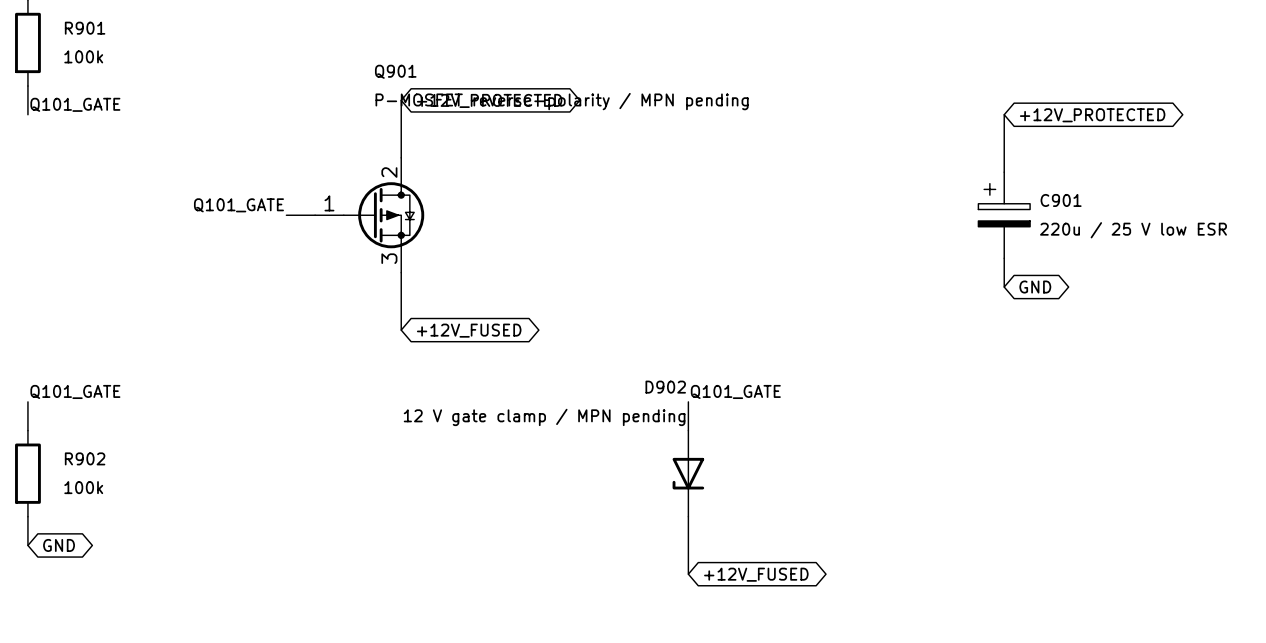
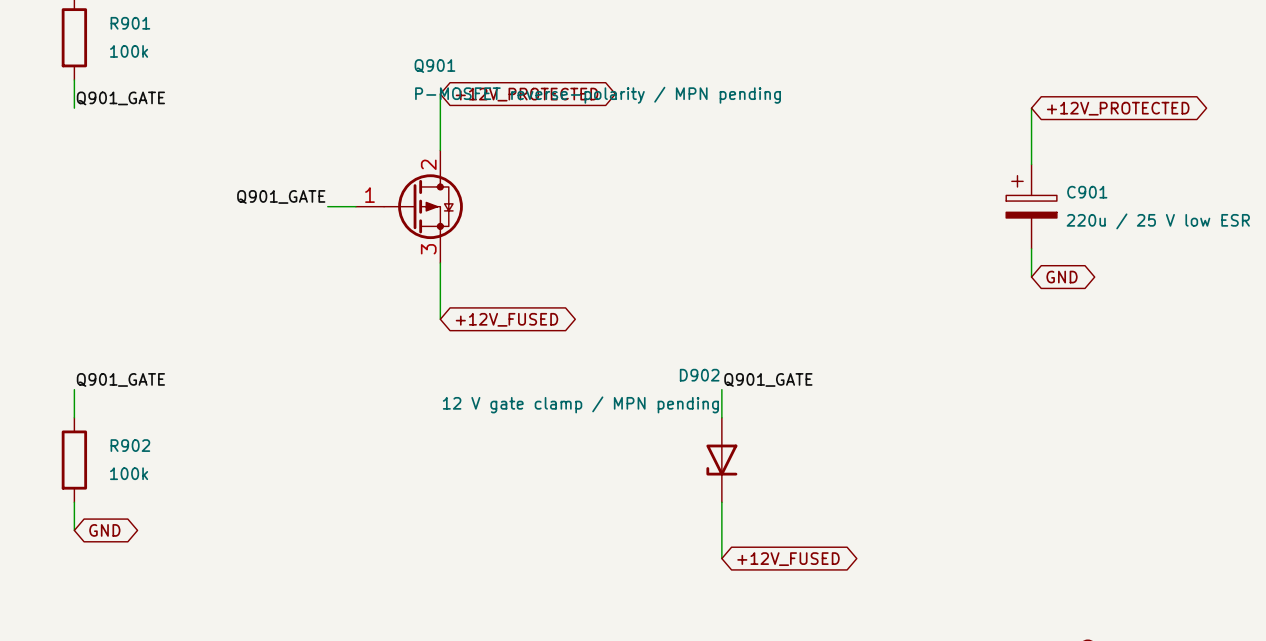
label: Q101_GATE (75, 104) -> Q901_GATE (120, 98)
label: Q101_GATE (238, 205) -> Q901_GATE (281, 196)
label: Q101_GATE (75, 391) -> Q901_GATE (120, 379)
label: Q101_GATE (735, 391) -> Q901_GATE (768, 379)

